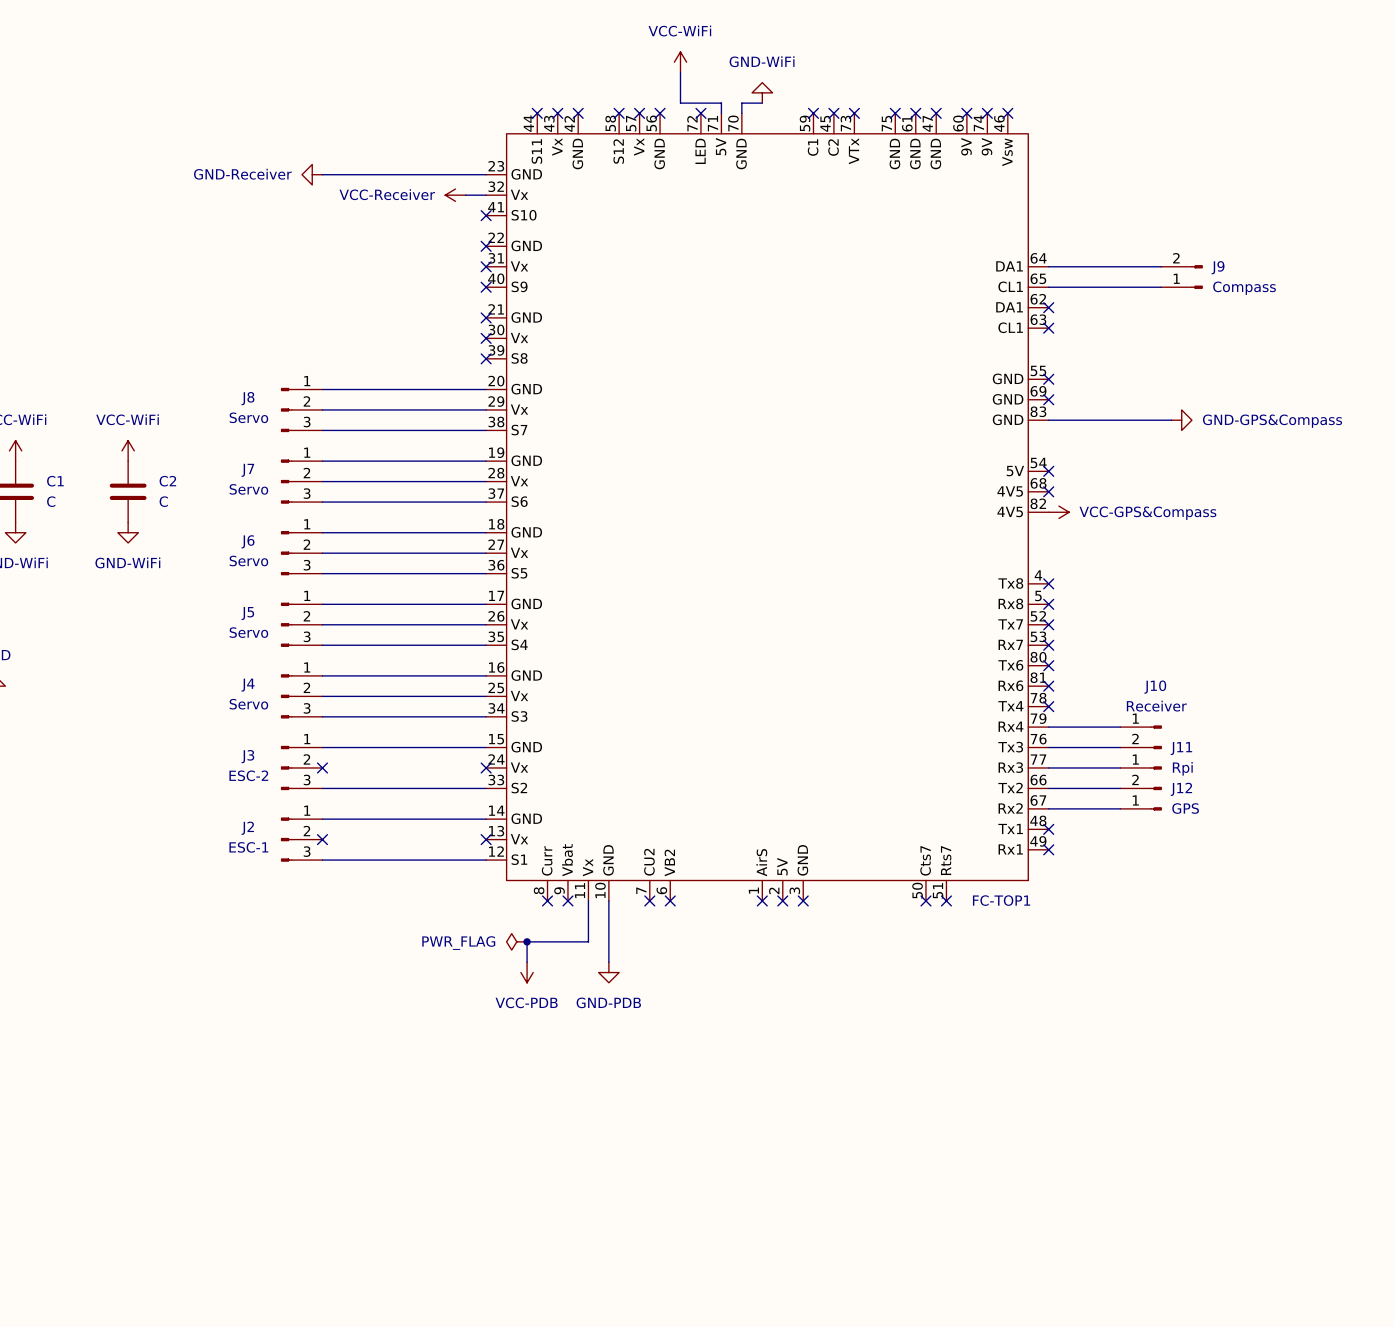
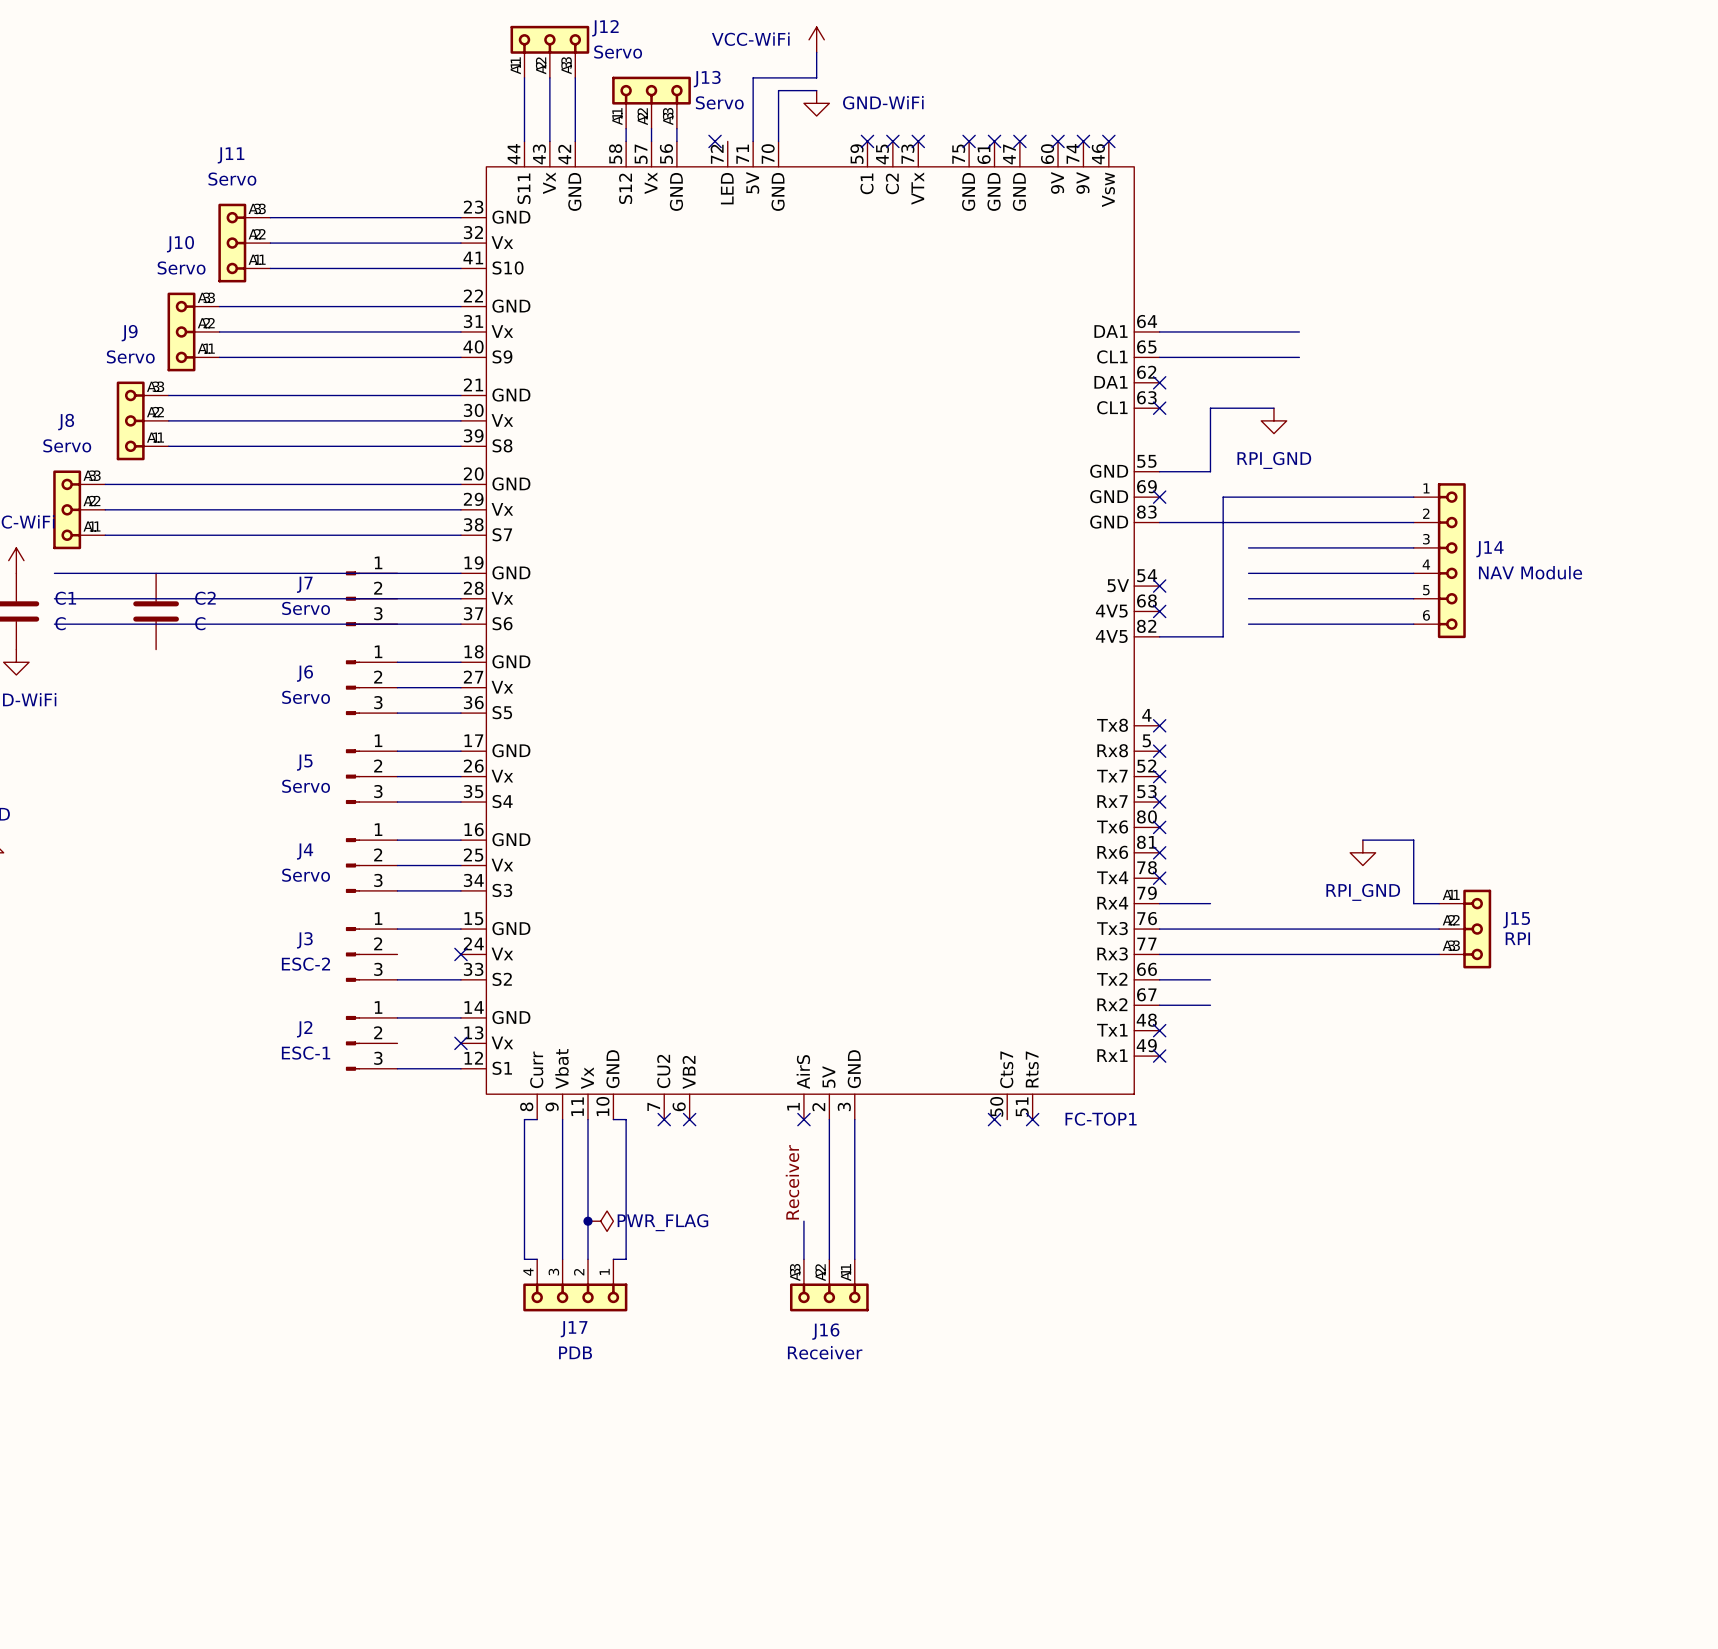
power symbol text position: VCC-WiFi (679, 31) -> VCC-WiFi (750, 39)
wire: none -> (816, 52) (816, 77) (753, 77) (753, 141)
power symbol text position: GND-WiFi (762, 61) -> GND-WiFi (883, 102)
wire: none -> (524, 77) (524, 141)
wire: none -> (549, 77) (549, 141)
wire: none -> (575, 77) (575, 141)
power symbol position: VCC-WiFi (680, 62) -> VCC-WiFi (816, 39)
wire: none -> (816, 90) (778, 90) (778, 141)
wire: (680, 72) (680, 103) (721, 103) (721, 113) -> none
J13: none -> Servo (651, 102)
power symbol rotation: 0° (762, 92) -> 180° (816, 103)
power symbol position: GND-WiFi (762, 92) -> GND-WiFi (816, 103)
wire: none -> (626, 128) (626, 141)
wire: none -> (651, 128) (651, 141)
wire: none -> (676, 128) (676, 141)
wire: (762, 103) (741, 103) (741, 113) -> none
no-connect mark: (537, 113) -> none
no-connect mark: (557, 113) -> none
no-connect mark: (619, 113) -> none
no-connect mark: (639, 113) -> none
no-connect mark: (660, 113) -> none
no-connect mark: none -> (892, 141)
no-connect mark: none -> (918, 141)
no-connect mark: none -> (969, 141)
no-connect mark: none -> (994, 141)
no-connect mark: (813, 113) -> none
no-connect mark: none -> (1019, 141)
no-connect mark: (833, 113) -> none
no-connect mark: none -> (1083, 141)
no-connect mark: (915, 113) -> none
no-connect mark: (936, 113) -> none
no-connect mark: (966, 113) -> none
no-connect mark: (987, 113) -> none
no-connect mark: (1007, 113) -> none
wire: none -> (270, 217) (397, 217)
power symbol: GND-Receiver (312, 174) -> none
wire: (373, 174) (486, 174) -> none
wire: none -> (270, 243) (460, 243)
power symbol: VCC-Receiver (455, 195) -> none
wire: (465, 195) (486, 195) -> none
wire: none -> (270, 268) (460, 268)
no-connect mark: (486, 215) -> none
wire: none -> (219, 306) (460, 306)
no-connect mark: (486, 246) -> none
J9 symbol: [1161, 265, 1203, 289] -> [116, 381, 169, 461]
wire: none -> (219, 331) (460, 331)
no-connect mark: (486, 266) -> none
wire: (1048, 266) (1161, 266) -> (1299, 331) (1159, 331)
J9 name position: J9 (1218, 267) -> J9 (129, 333)
wire: none -> (219, 357) (460, 357)
no-connect mark: (486, 287) -> none
wire: (1048, 287) (1161, 287) -> (1299, 357) (1159, 357)
J9 value: Compass (1244, 288) -> Servo (130, 356)
no-connect mark: none -> (1159, 382)
no-connect mark: (1048, 307) -> none
wire: none -> (168, 395) (460, 395)
no-connect mark: (486, 317) -> none
no-connect mark: none -> (1159, 408)
wire: none -> (1273, 408) (1210, 408) (1210, 471) (1159, 471)
no-connect mark: (1048, 328) -> none
wire: none -> (168, 420) (460, 420)
no-connect mark: (486, 338) -> none
power symbol: none -> RPI_GND (1273, 420)
wire: none -> (168, 446) (460, 446)
no-connect mark: (486, 358) -> none
no-connect mark: (1048, 379) -> none
J8 symbol: [280, 387, 323, 433] -> [53, 470, 106, 550]
wire: none -> (105, 484) (397, 484)
wire: (373, 389) (486, 389) -> none
J8 name position: J8 (247, 398) -> J8 (66, 422)
no-connect mark: none -> (1159, 497)
no-connect mark: (1048, 399) -> none
wire: none -> (1413, 497) (1223, 497) (1223, 636) (1159, 636)
wire: none -> (105, 509) (397, 509)
wire: (373, 409) (486, 409) -> none
J8 value position: Servo (248, 417) -> Servo (67, 445)
wire: none -> (1159, 522) (1299, 522)
power symbol: GND-GPS&Compass (1181, 420) -> none
wire: none -> (105, 535) (397, 535)
wire: (373, 430) (486, 430) -> none
wire: none -> (1248, 547) (1413, 547)
power symbol: VCC-WiFi (128, 450) -> none
J14: none -> NAV Module (1439, 560)
wire: none -> (54, 573) (397, 573)
wire: (373, 461) (486, 461) -> none
wire: none -> (1248, 573) (1413, 573)
no-connect mark: none -> (1159, 586)
no-connect mark: (1048, 471) -> none
wire: none -> (54, 598) (397, 598)
wire: (373, 481) (486, 481) -> none
wire: none -> (1248, 598) (1413, 598)
no-connect mark: none -> (1159, 611)
no-connect mark: (1048, 491) -> none
wire: none -> (54, 624) (397, 624)
wire: (373, 502) (486, 502) -> none
wire: none -> (1248, 624) (1413, 624)
FC-TOP1 position: (767, 507) -> (810, 630)
power symbol: VCC-GPS&Compass (1058, 512) -> none
power symbol: GND-WiFi (128, 532) -> none
wire: (373, 532) (486, 532) -> none
wire: (373, 553) (486, 553) -> none
wire: (373, 573) (486, 573) -> none
no-connect mark: none -> (1159, 725)
no-connect mark: (1048, 583) -> none
wire: (373, 604) (486, 604) -> none
no-connect mark: none -> (1159, 751)
no-connect mark: (1048, 604) -> none
wire: (373, 624) (486, 624) -> none
no-connect mark: none -> (1159, 776)
no-connect mark: (1048, 624) -> none
wire: (373, 645) (486, 645) -> none
no-connect mark: none -> (1159, 802)
no-connect mark: (1048, 645) -> none
no-connect mark: none -> (1159, 827)
no-connect mark: (1048, 665) -> none
wire: (373, 675) (486, 675) -> none
wire: none -> (1362, 840) (1413, 840) (1413, 903) (1439, 903)
no-connect mark: none -> (1159, 852)
no-connect mark: (1048, 686) -> none
power symbol: none -> RPI_GND (1362, 852)
J10 name position: J10 (1155, 687) -> J10 (180, 244)
wire: (373, 696) (486, 696) -> none
no-connect mark: none -> (1159, 878)
no-connect mark: (1048, 706) -> none
J10 value: Receiver (1156, 706) -> Servo (181, 268)
wire: (373, 716) (486, 716) -> none
J10 symbol: [1120, 725, 1162, 729] -> [167, 292, 220, 372]
wire: none -> (1159, 903) (1210, 903)
wire: (1048, 727) (1120, 727) -> none
J11 symbol: [1120, 745, 1162, 770] -> [218, 203, 271, 283]
wire: (373, 747) (486, 747) -> none
wire: none -> (1159, 929) (1299, 929)
J15: none -> RPI (1465, 929)
J11 name position: J11 (1181, 748) -> J11 (231, 155)
no-connect mark: (322, 767) -> none
no-connect mark: none -> (460, 954)
no-connect mark: (486, 767) -> none
wire: none -> (1159, 954) (1299, 954)
J11 value: Rpi (1182, 768) -> Servo (232, 179)
J12 symbol: [1120, 786, 1162, 811] -> [510, 25, 590, 78]
wire: (373, 788) (486, 788) -> none
wire: none -> (1159, 979) (1210, 979)
wire: (1048, 788) (1120, 788) -> none
wire: none -> (1159, 1005) (1210, 1005)
wire: (1048, 808) (1120, 808) -> none
J12 value: GPS (1185, 808) -> Servo (618, 52)
wire: (373, 819) (486, 819) -> none
no-connect mark: none -> (1159, 1030)
no-connect mark: (1048, 829) -> none
no-connect mark: (322, 839) -> none
no-connect mark: none -> (460, 1043)
no-connect mark: (486, 839) -> none
no-connect mark: none -> (1159, 1056)
no-connect mark: (1048, 849) -> none
wire: (373, 860) (486, 860) -> none
wire: none -> (537, 1119) (524, 1119) (524, 1259) (537, 1259)
wire: none -> (562, 1119) (562, 1259)
wire: none -> (588, 1119) (588, 1259)
wire: none -> (613, 1119) (626, 1119) (626, 1259) (613, 1259)
no-connect mark: none -> (664, 1119)
no-connect mark: (547, 900) -> none
no-connect mark: none -> (689, 1119)
no-connect mark: (567, 900) -> none
wire: (588, 900) (588, 941) (527, 941) (527, 962) -> none
wire: (608, 900) (608, 962) -> none
wire: none -> (829, 1119) (829, 1259)
no-connect mark: (670, 900) -> none
wire: none -> (854, 1119) (854, 1259)
no-connect mark: (762, 900) -> none
no-connect mark: (782, 900) -> none
no-connect mark: none -> (1032, 1119)
no-connect mark: (925, 900) -> none
no-connect mark: (946, 900) -> none
power symbol rotation: 0° (516, 941) -> 180° (600, 1221)
power symbol position: PWR_FLAG (516, 941) -> PWR_FLAG (600, 1221)
junction: (527, 941) -> none
label: none -> Receiver (792, 1182)
power symbol: VCC-PDB (527, 972) -> none
power symbol: GND-PDB (608, 972) -> none
junction: none -> (588, 1221)
wire: none -> (803, 1221) (803, 1259)
J17: none -> PDB (575, 1285)
J16: none -> Receiver (829, 1285)

